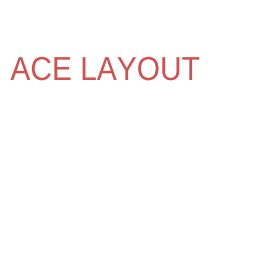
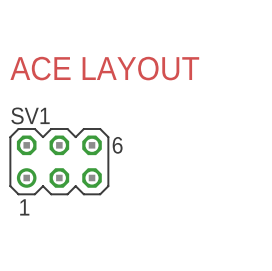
SV1: none -> (59, 161)

